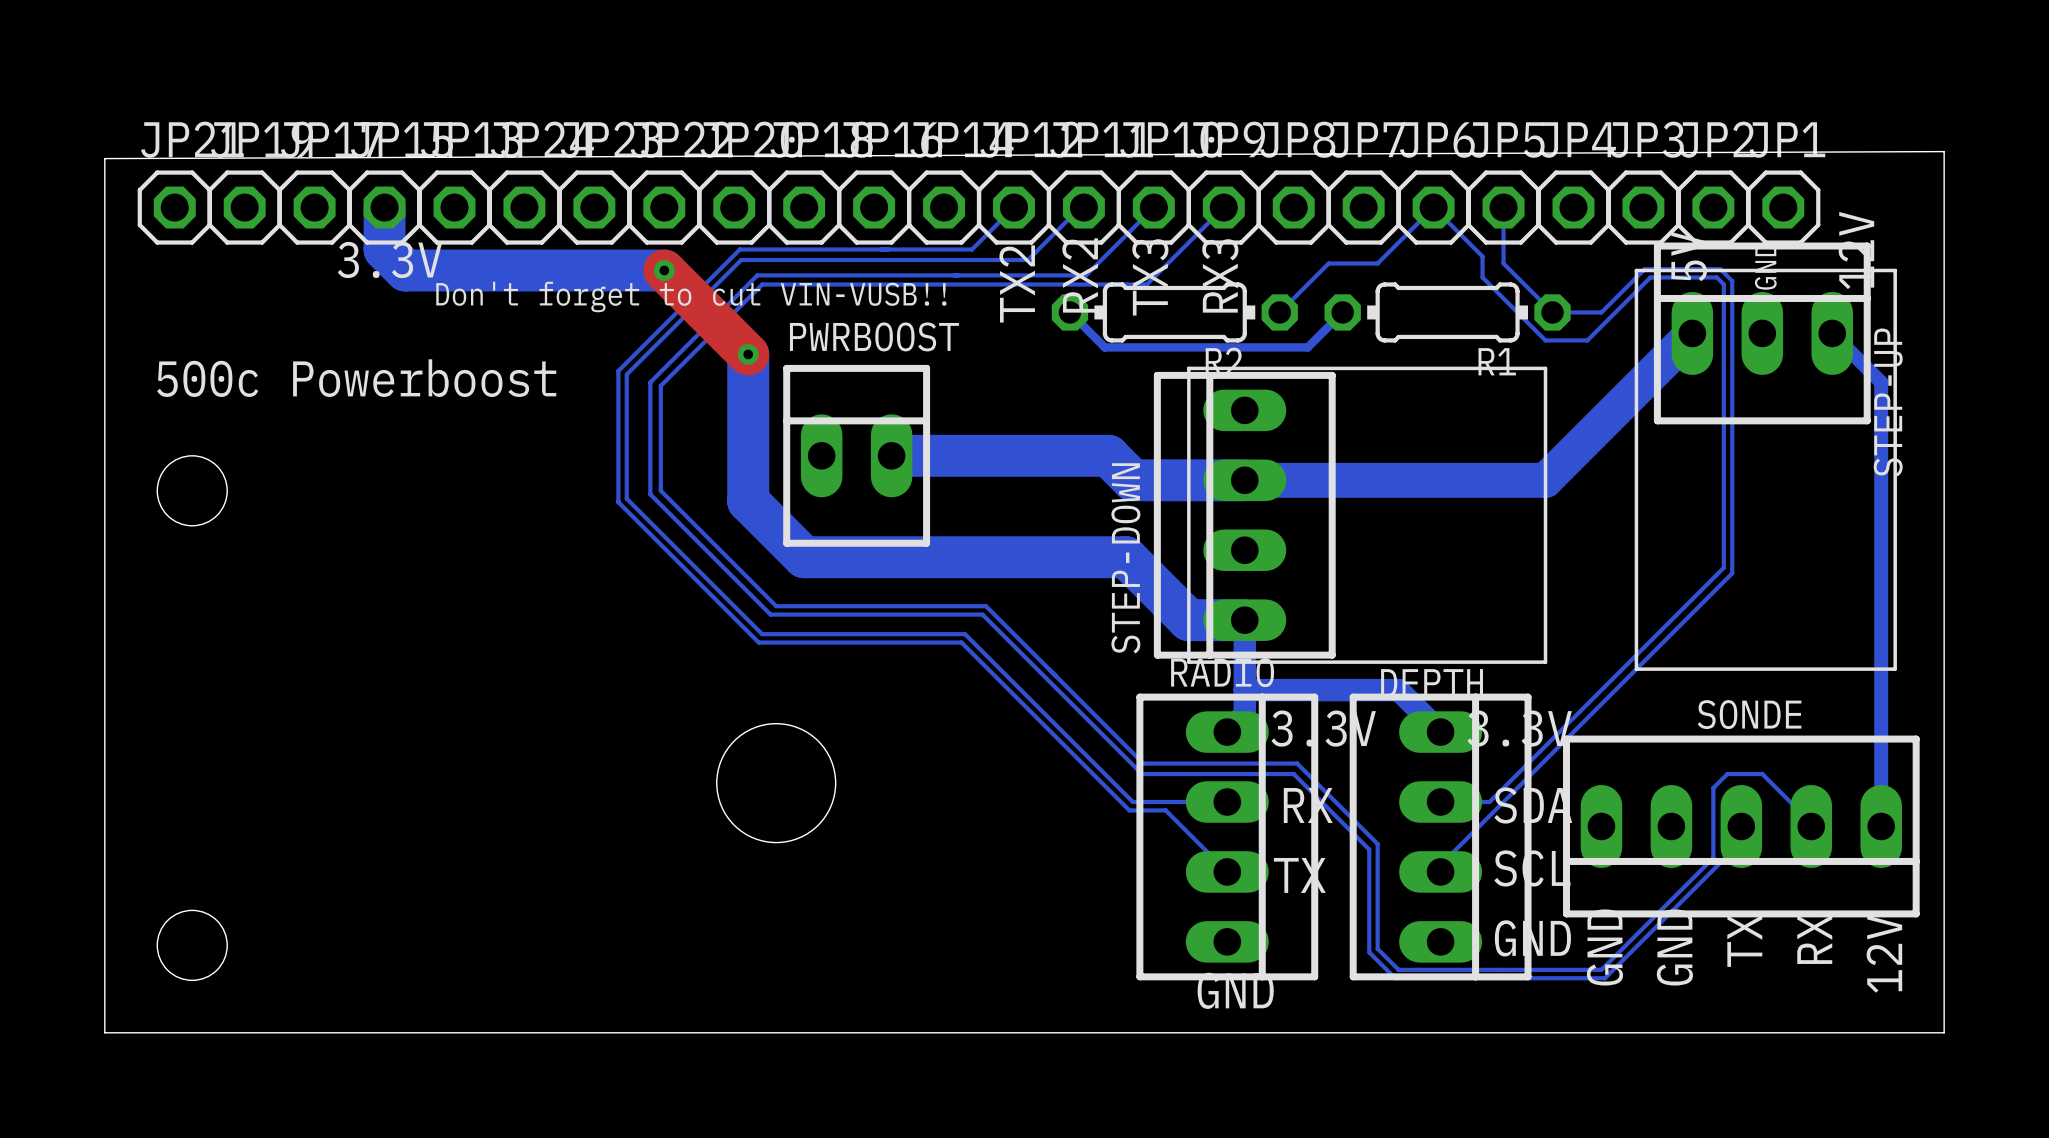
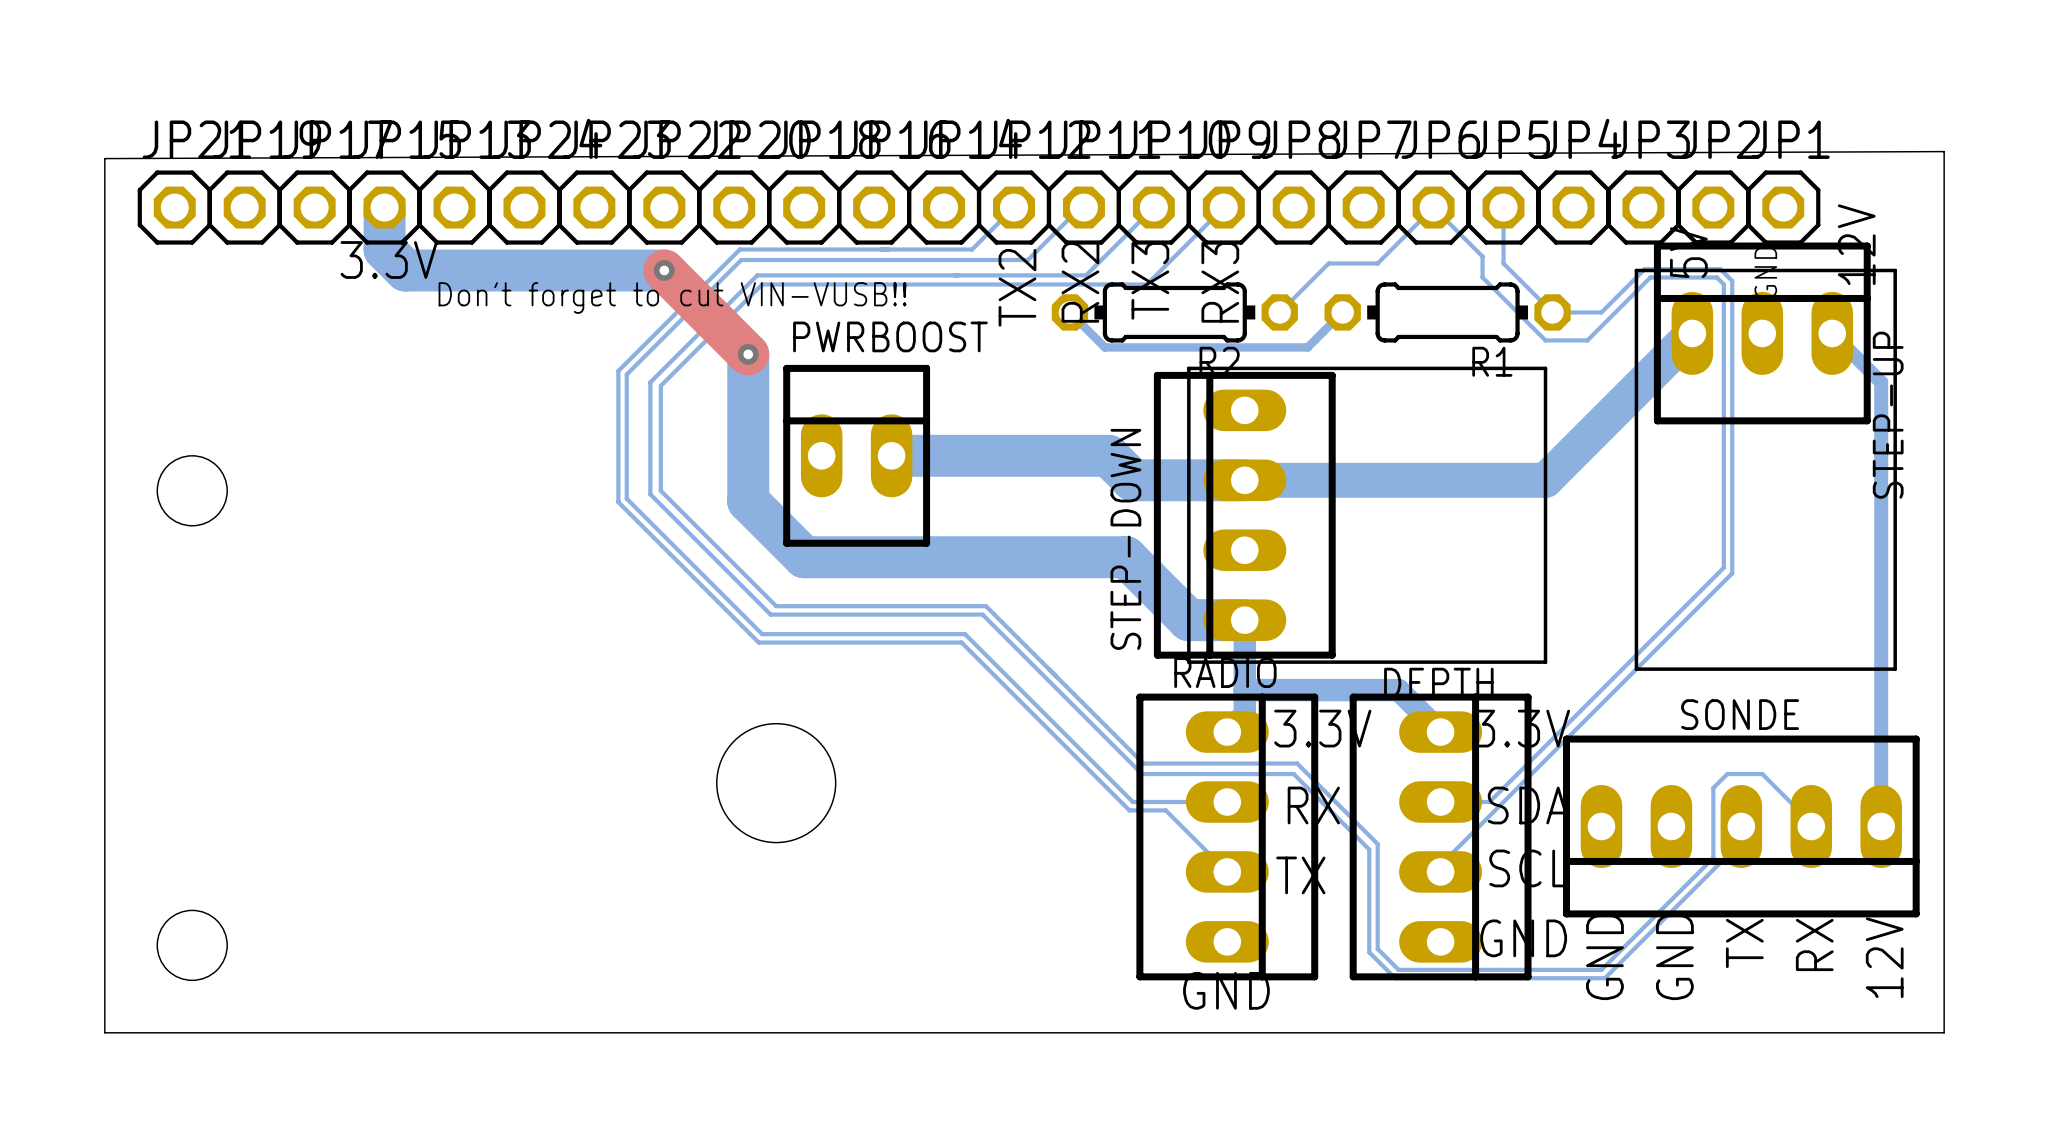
text: 500c Powerboost (356, 378) -> none

